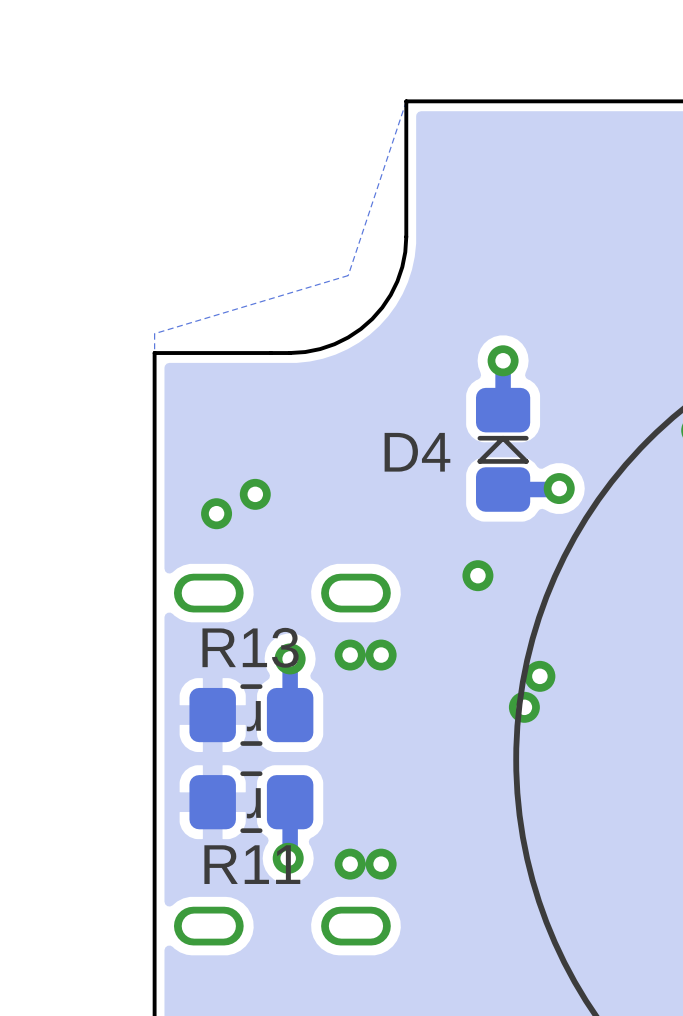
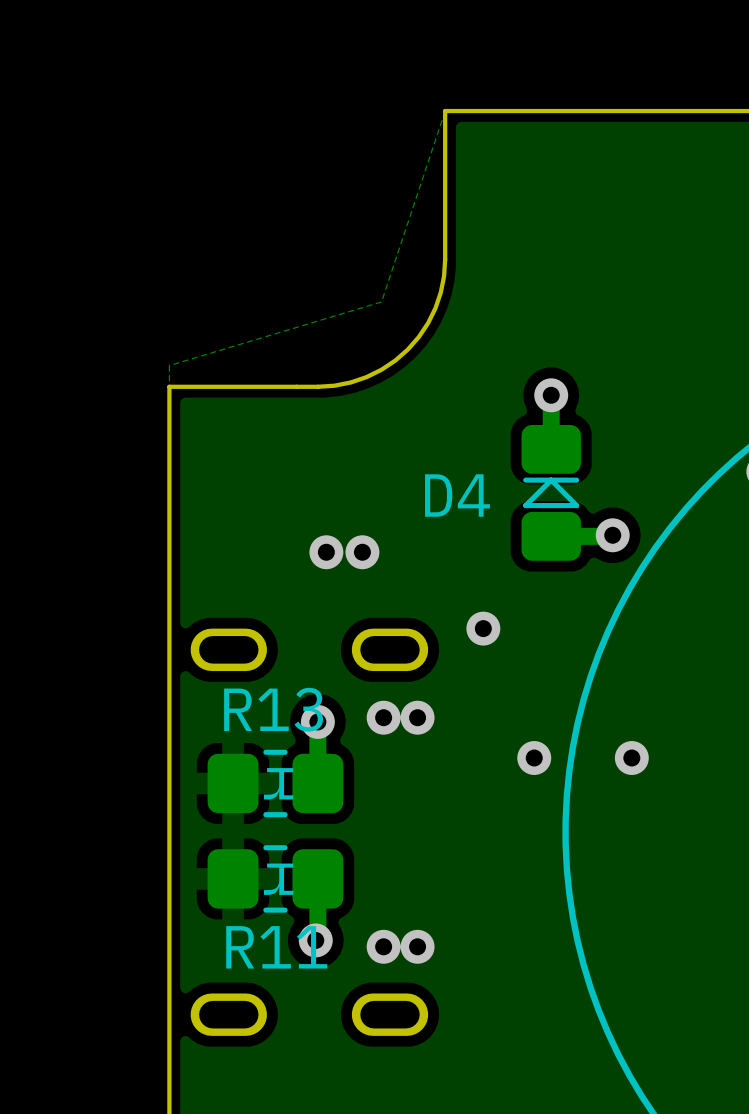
via: (255, 494) -> none
via: none -> (326, 552)
via: none -> (362, 552)
via: (216, 513) -> none
via position: (477, 575) -> (483, 628)
via: (539, 676) -> none
via: none -> (534, 758)
via: none -> (631, 758)
via: (524, 707) -> none

